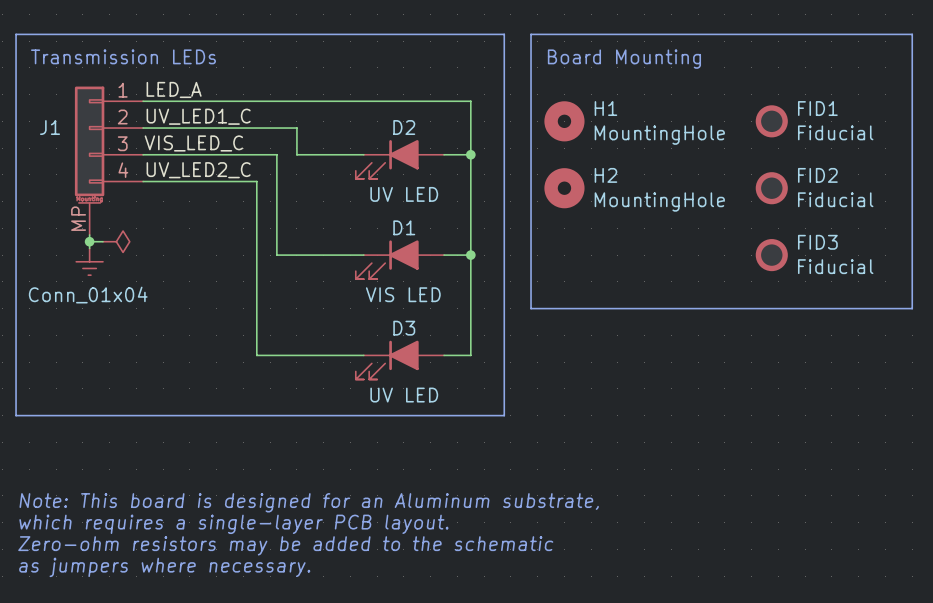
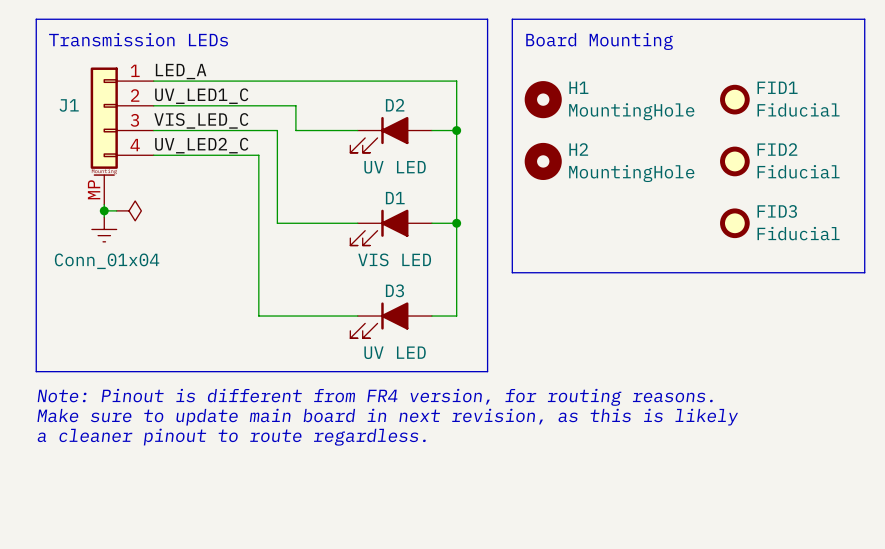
text: none -> Note: Pinout is different from FR4 version, for routing reasons. (375, 397)
text: none -> Make sure to update main board in next revision, as this is likely (387, 417)
text: none -> a cleaner pinout to route regardless. (231, 437)
text: Note: This board is designed for an Aluminum substrate, (309, 502) -> none
text: which requires a single-layer PCB layout. (233, 524) -> none
text: Zero-ohm resistors may be added to the schematic (285, 545) -> none
text: as jumpers where necessary. (164, 567) -> none

